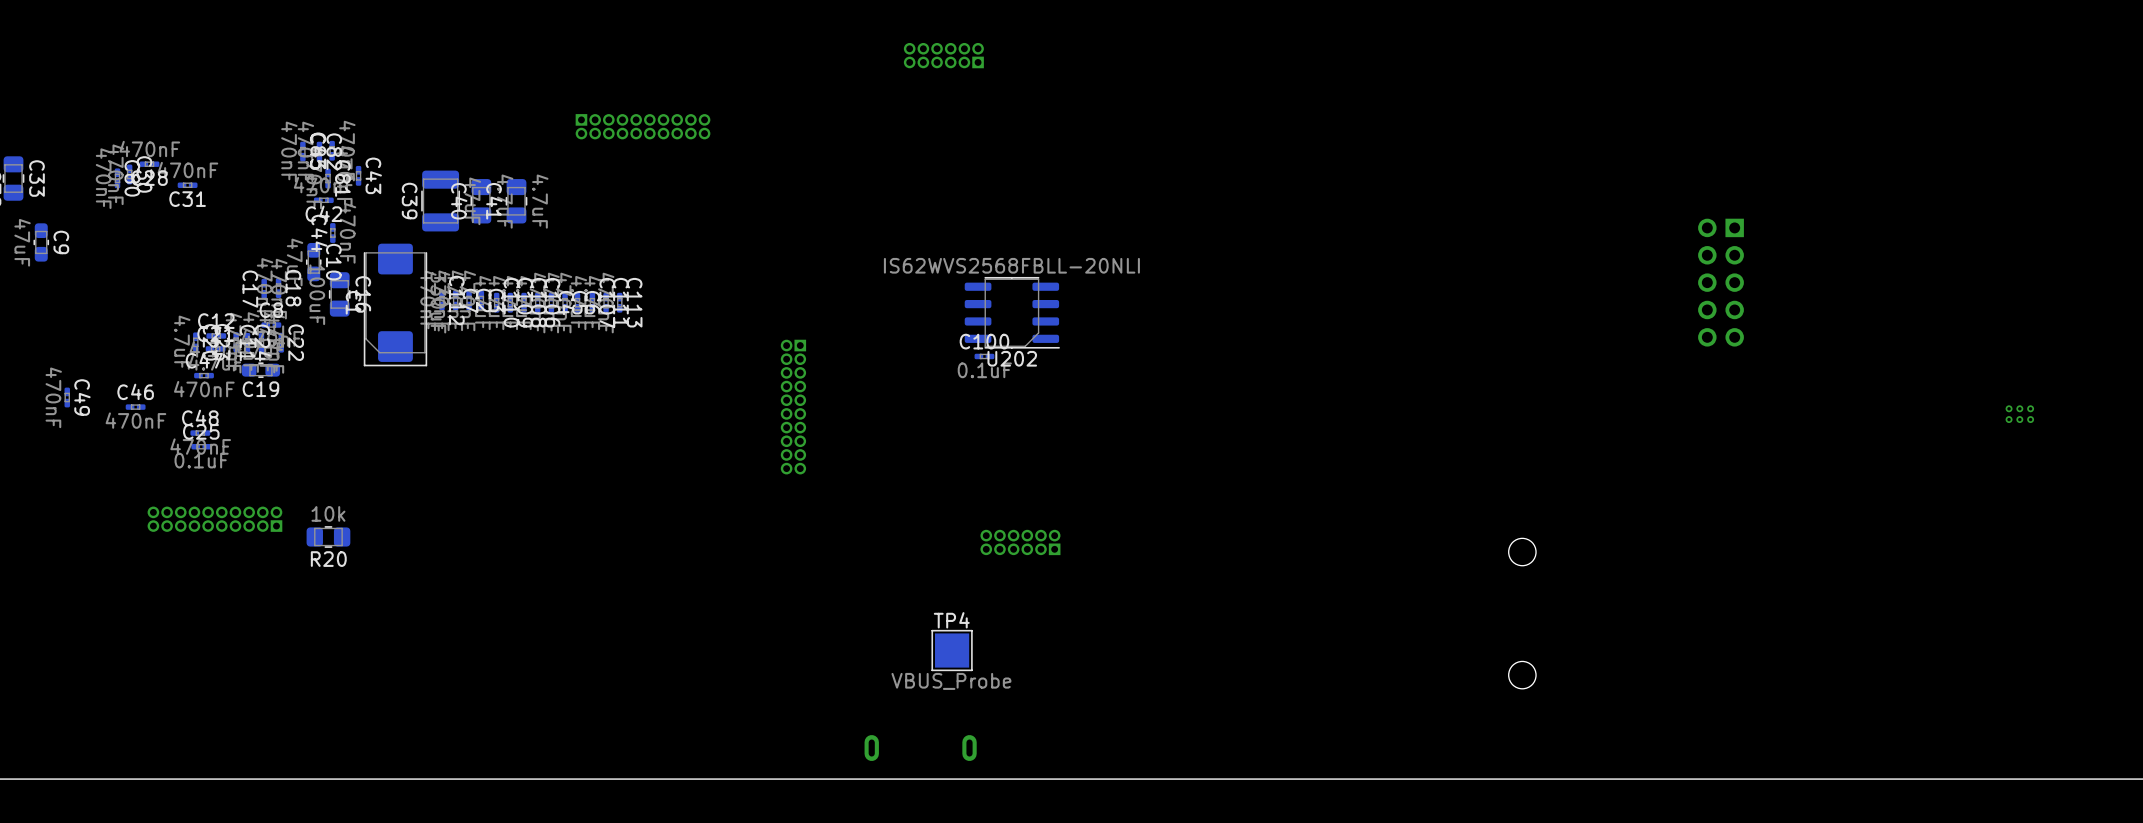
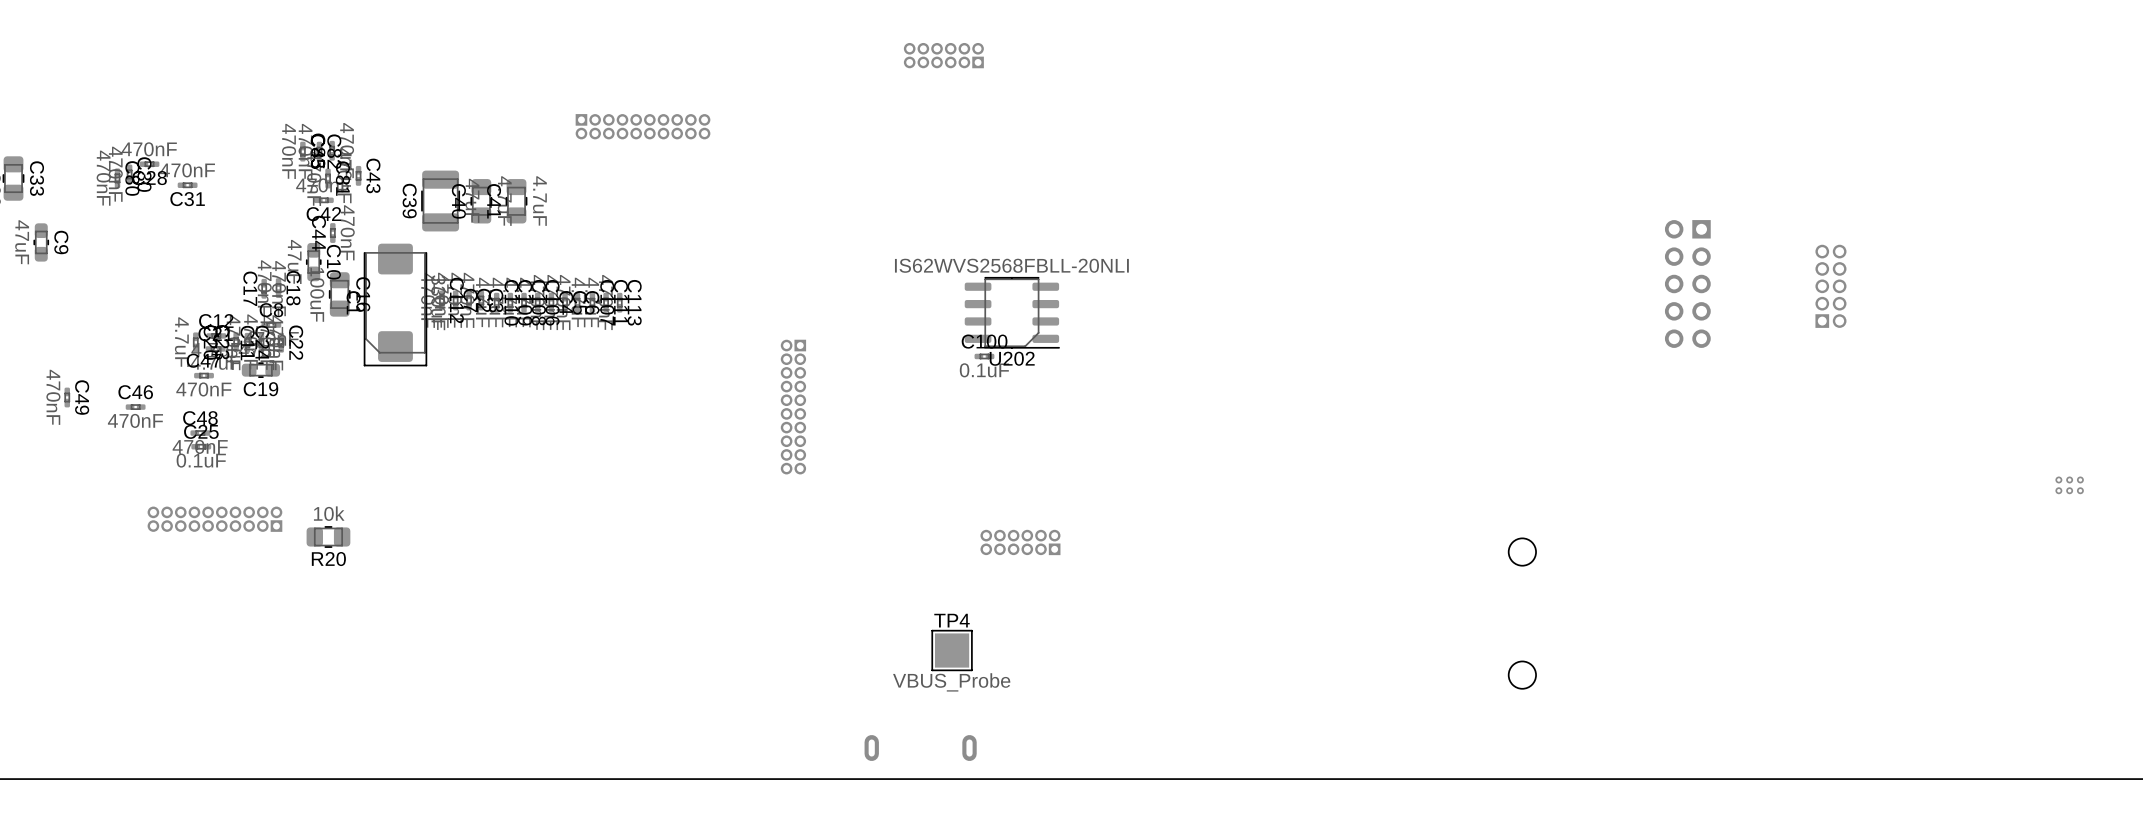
part position: (1721, 282) -> (1687, 283)
part: none -> (1830, 286)
part position: (2019, 414) -> (2069, 485)

